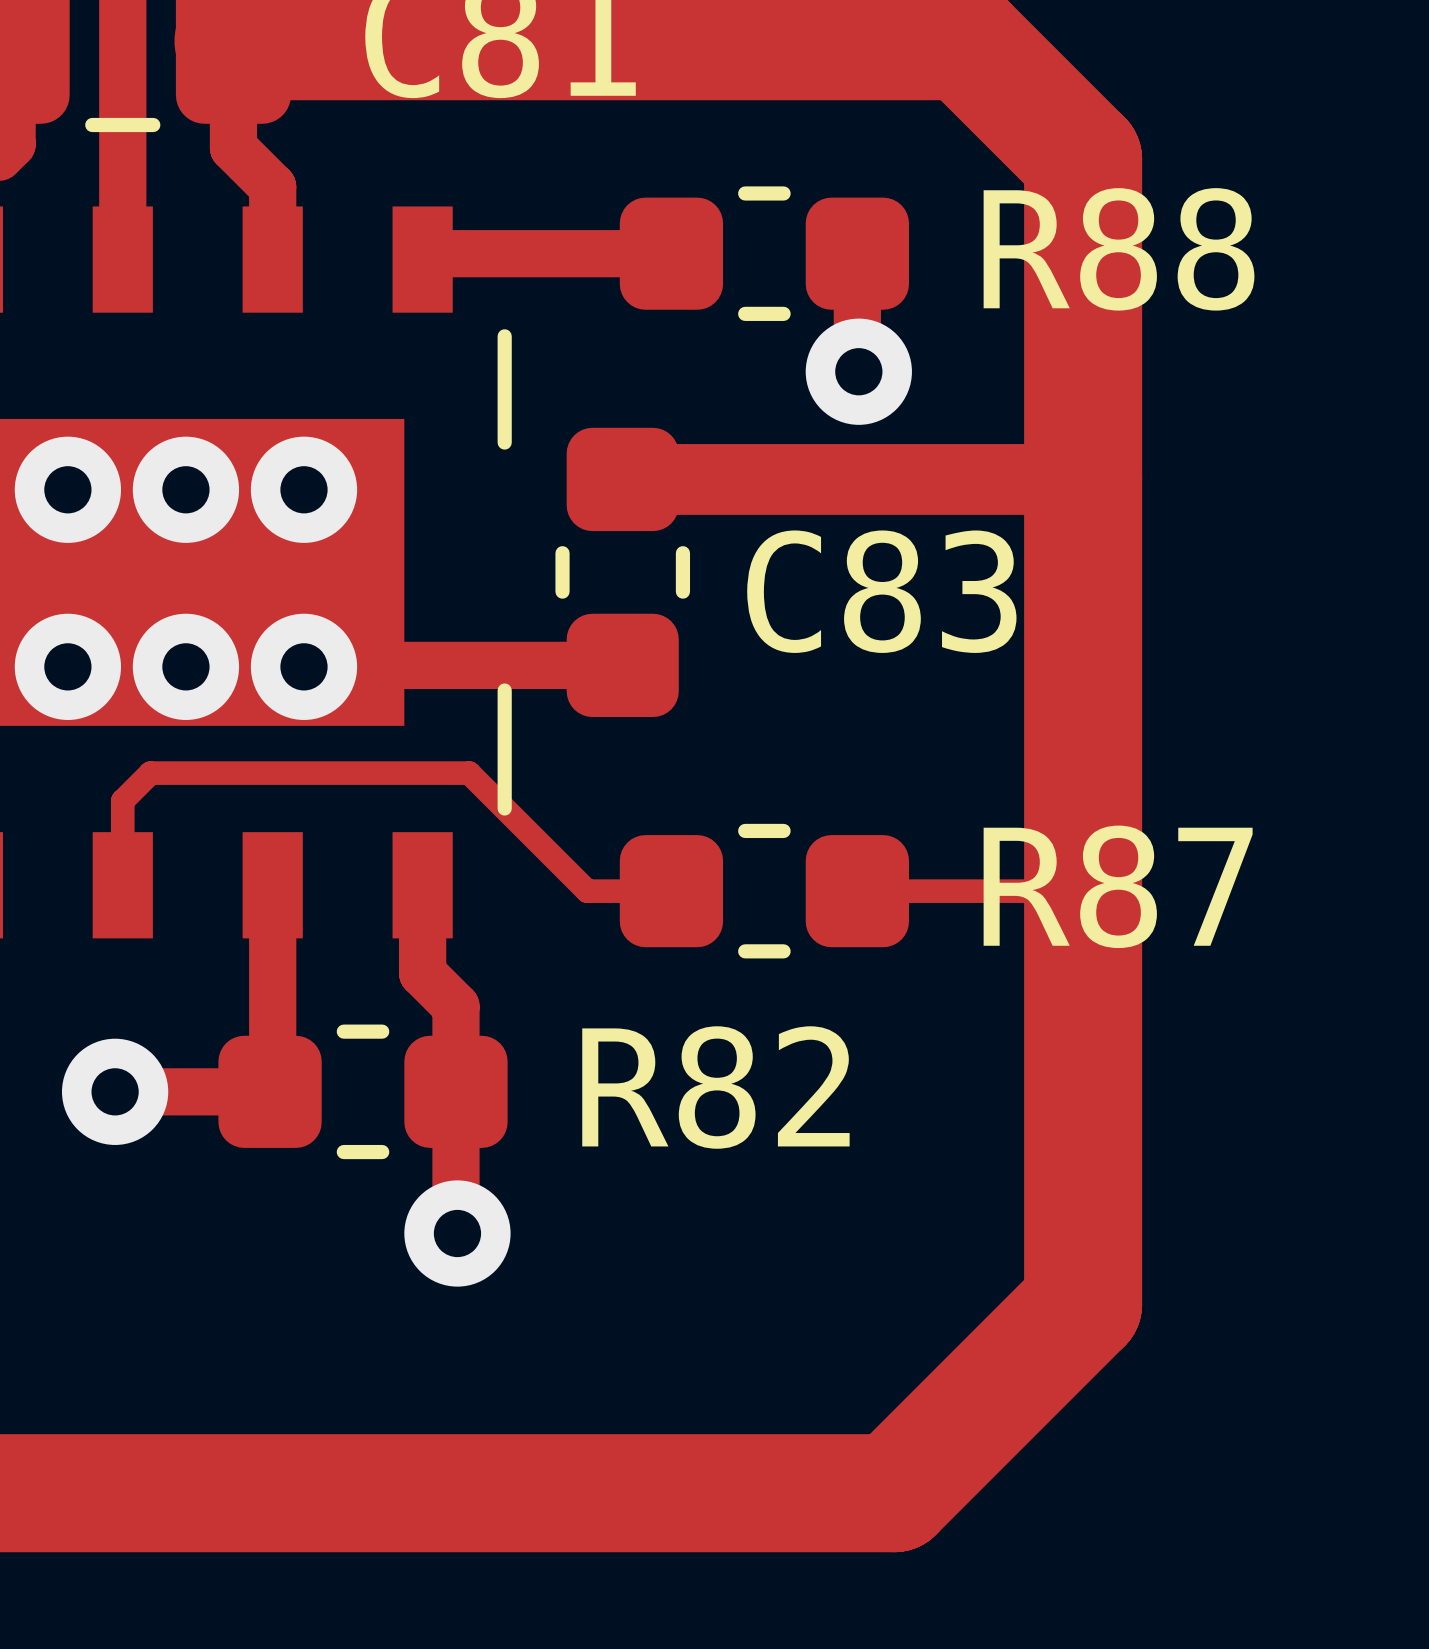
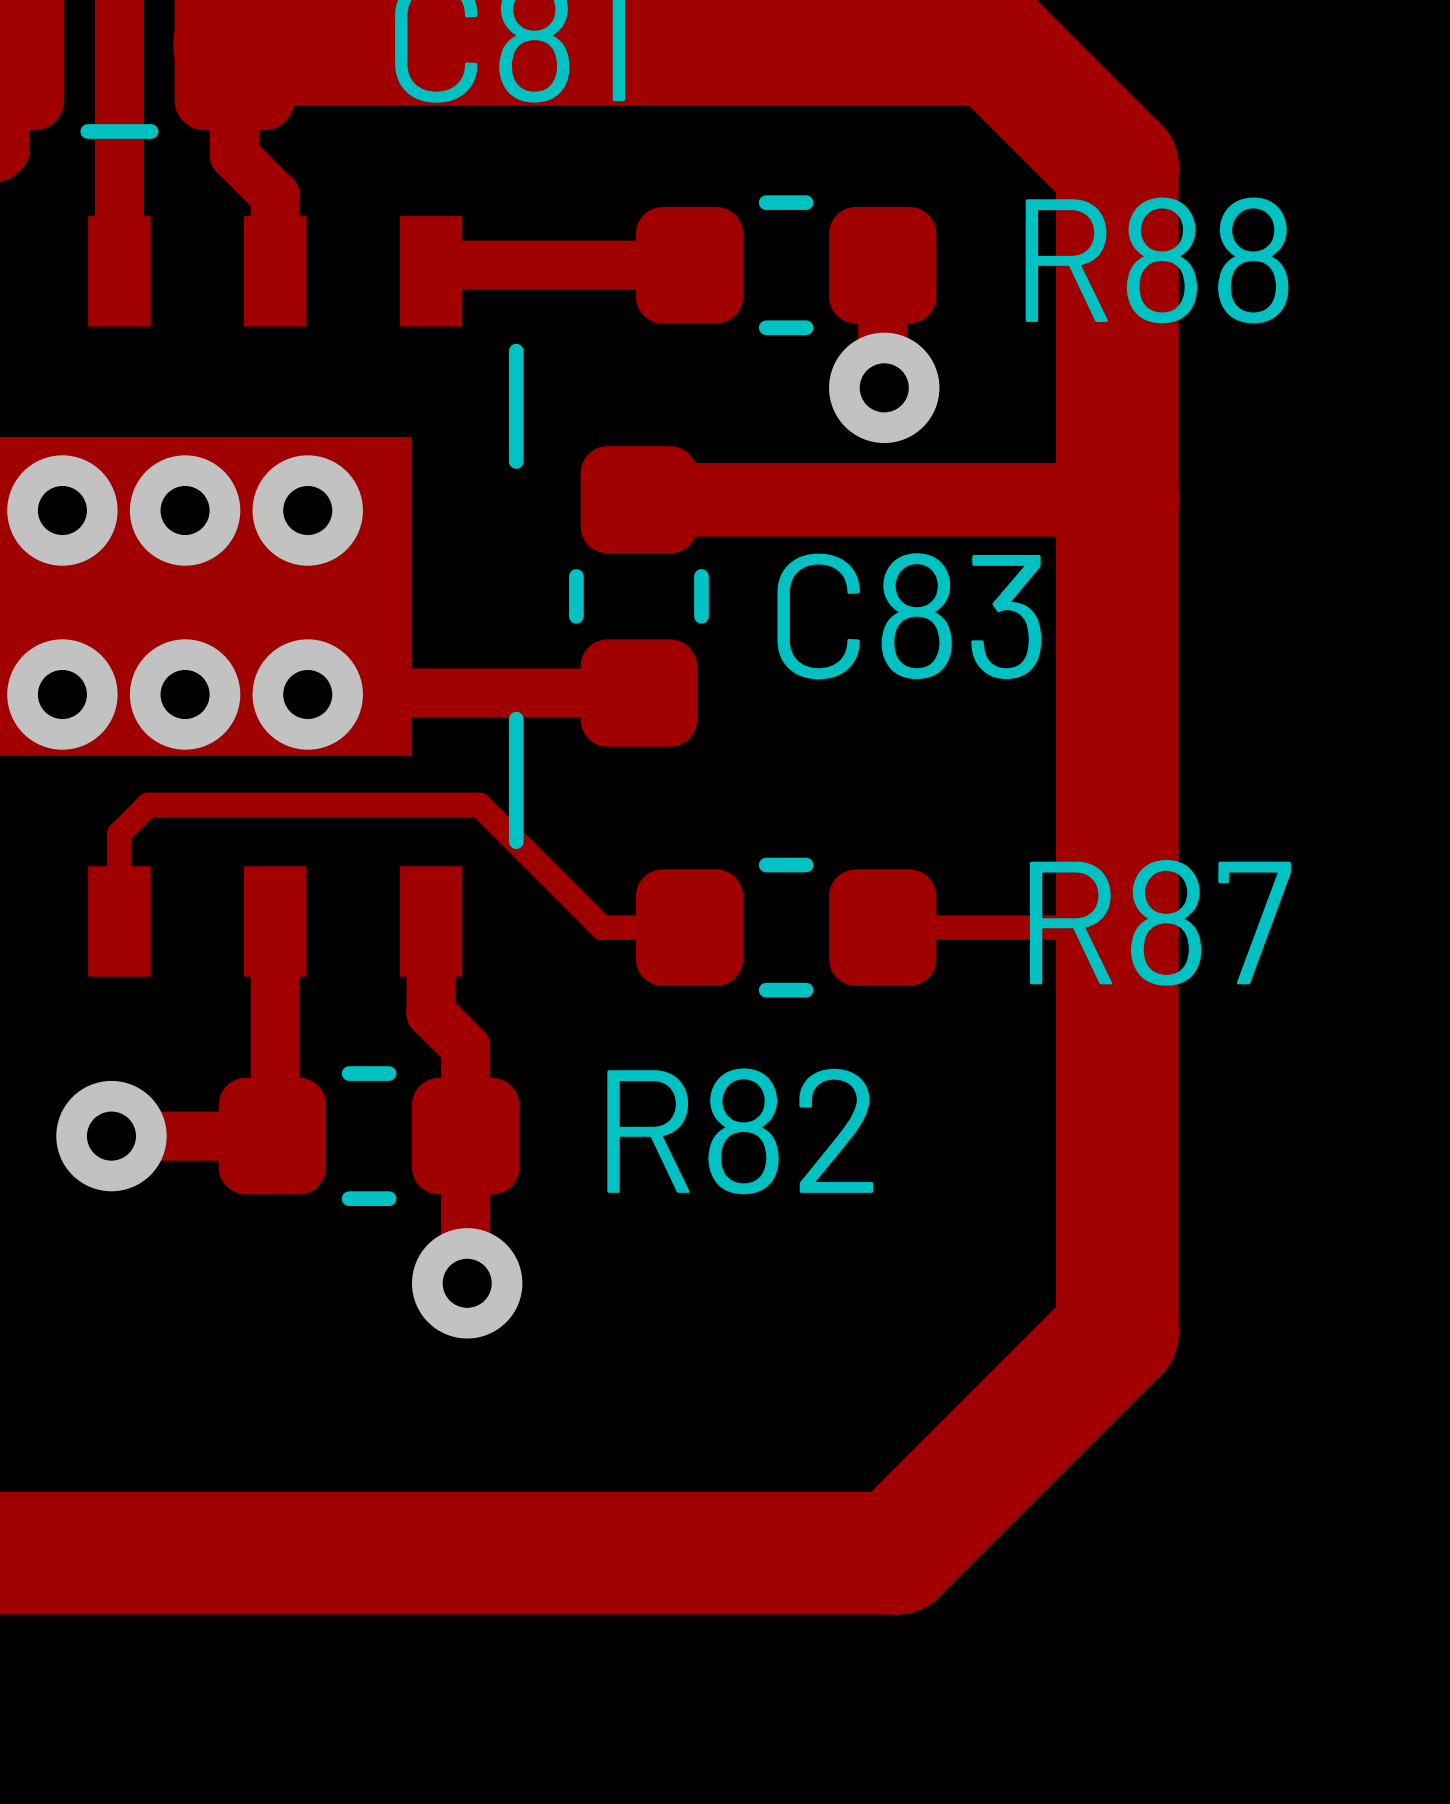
track: (1083, 1280) (1083, 1304) (894, 1493) (870, 1493) -> (1117, 1332) (896, 1553)

